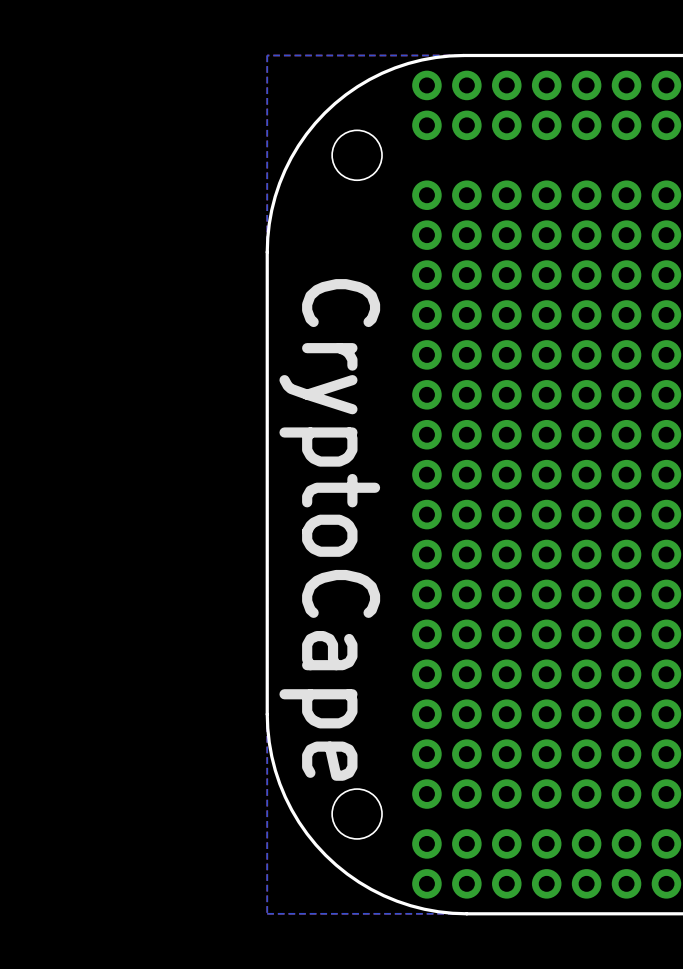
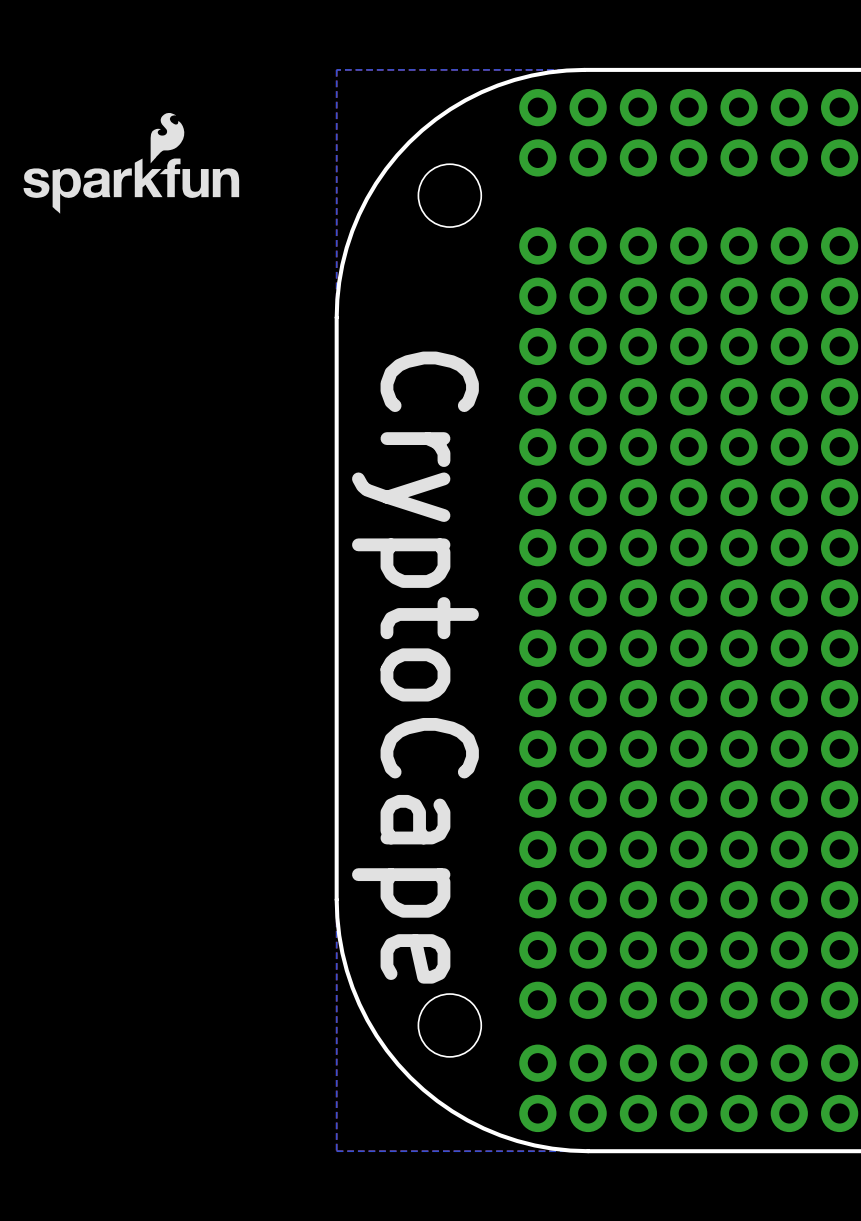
drawing: none -> [23, 112, 240, 214]

